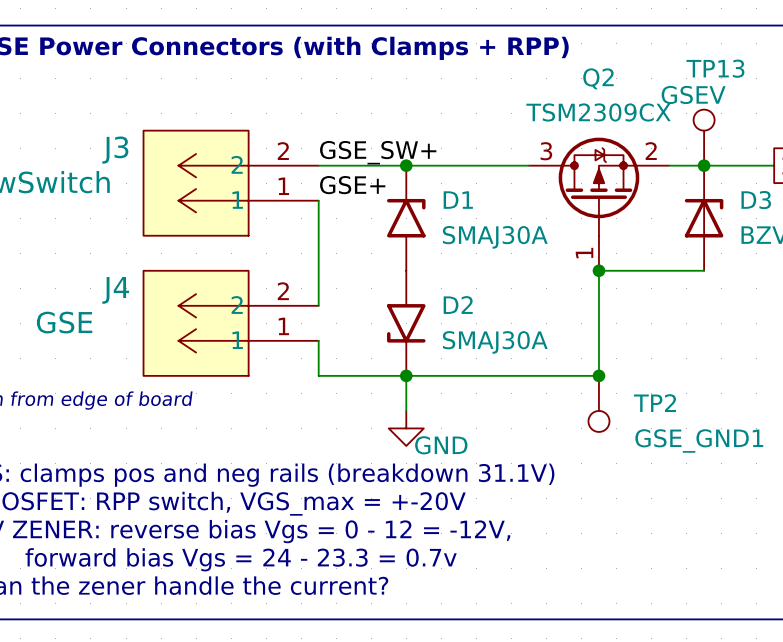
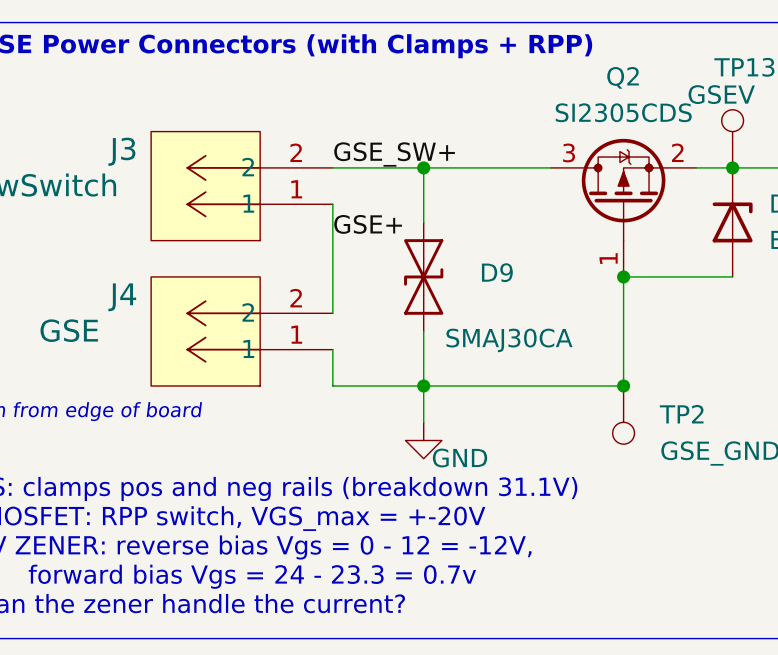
Q2 value: TSM2309CX (598, 112) -> SI2305CDS (623, 112)
label position: GSE+ (352, 185) -> GSE+ (368, 224)
D1: SMAJ30A (406, 218) -> none
D9: none -> SMAJ30CA (423, 276)
D2: SMAJ30A (406, 323) -> none

